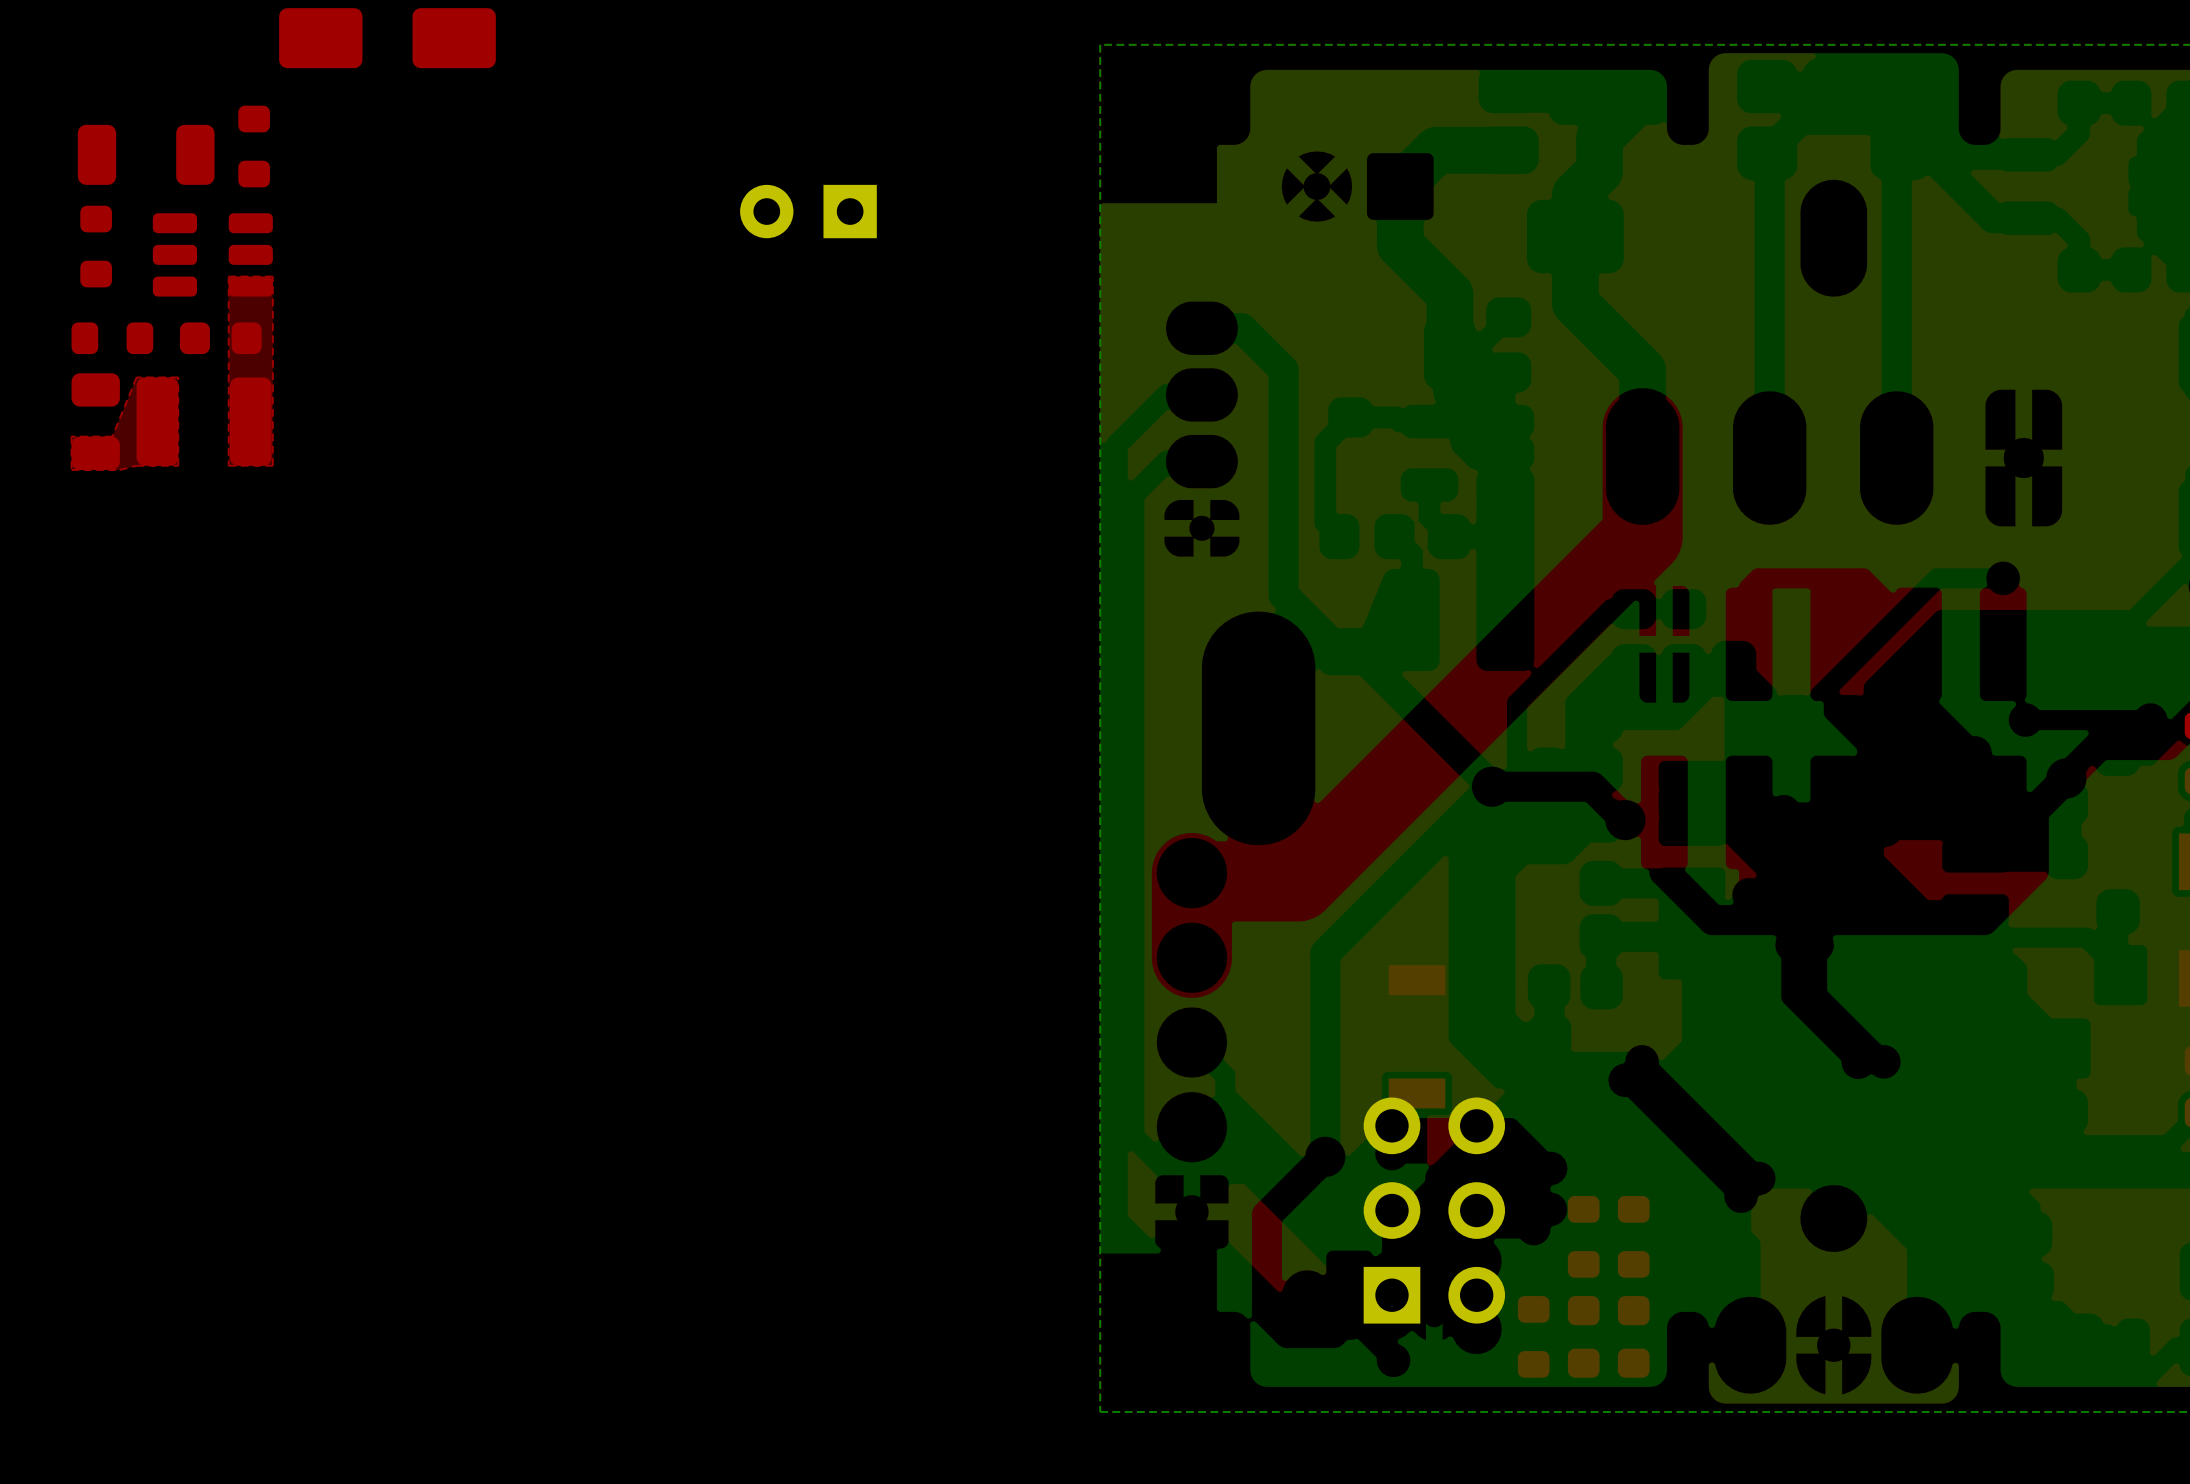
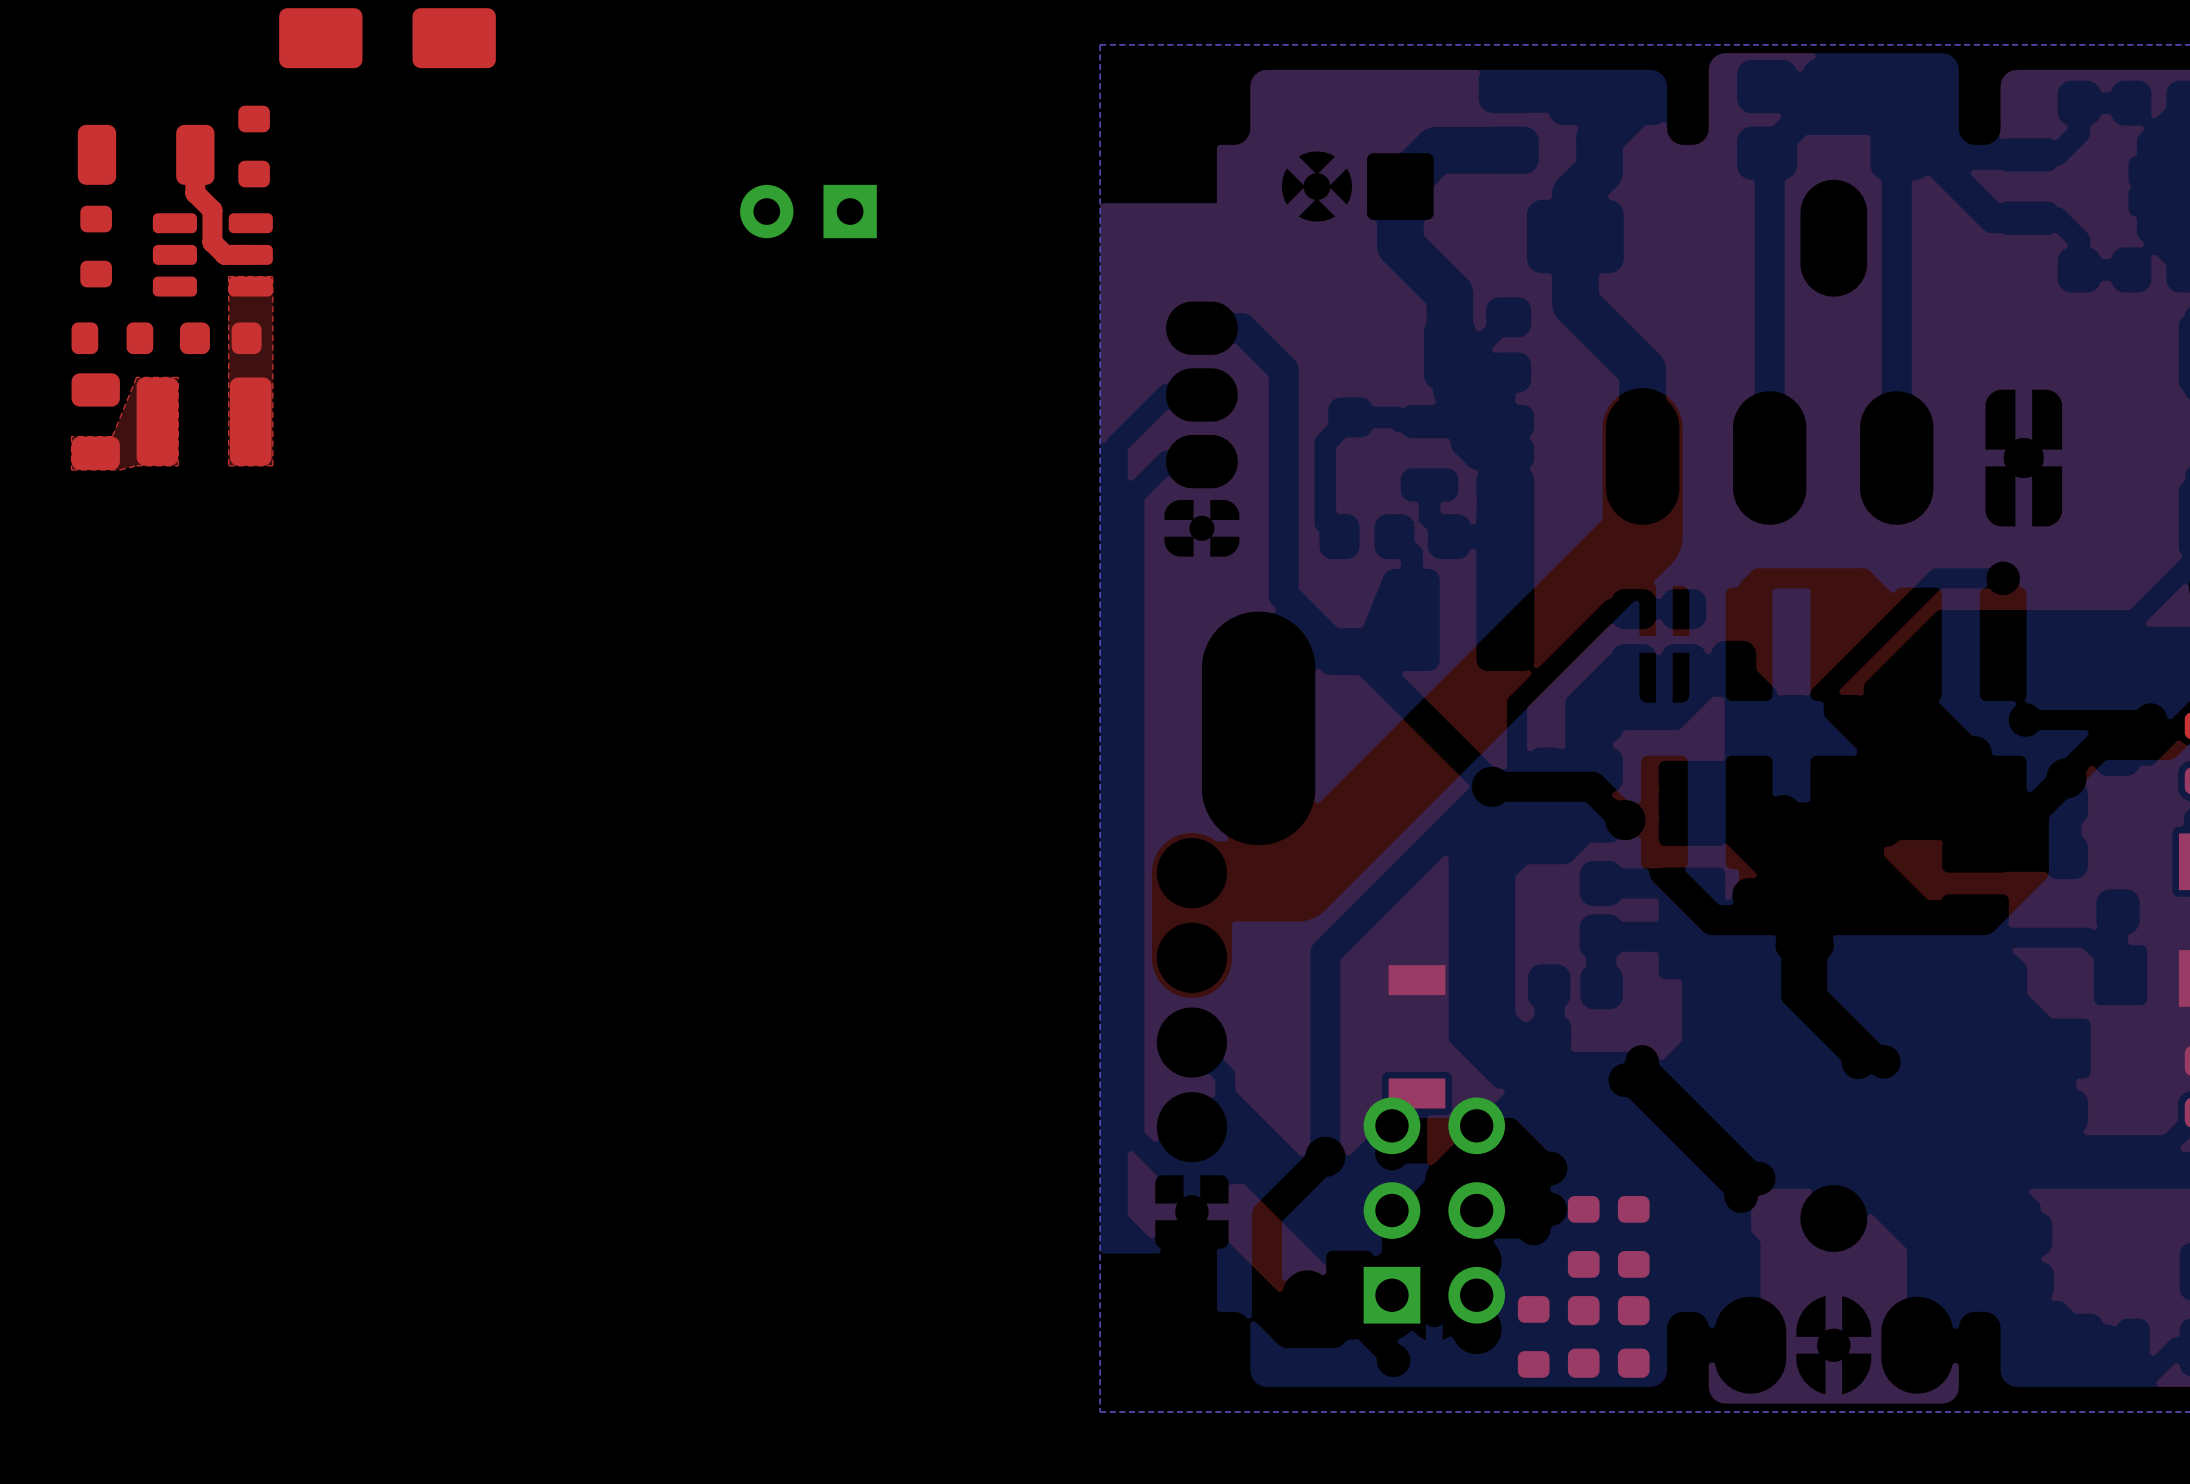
top track: none -> (195, 154) (195, 193) (212, 210) (212, 242) (224, 254) (250, 254)

